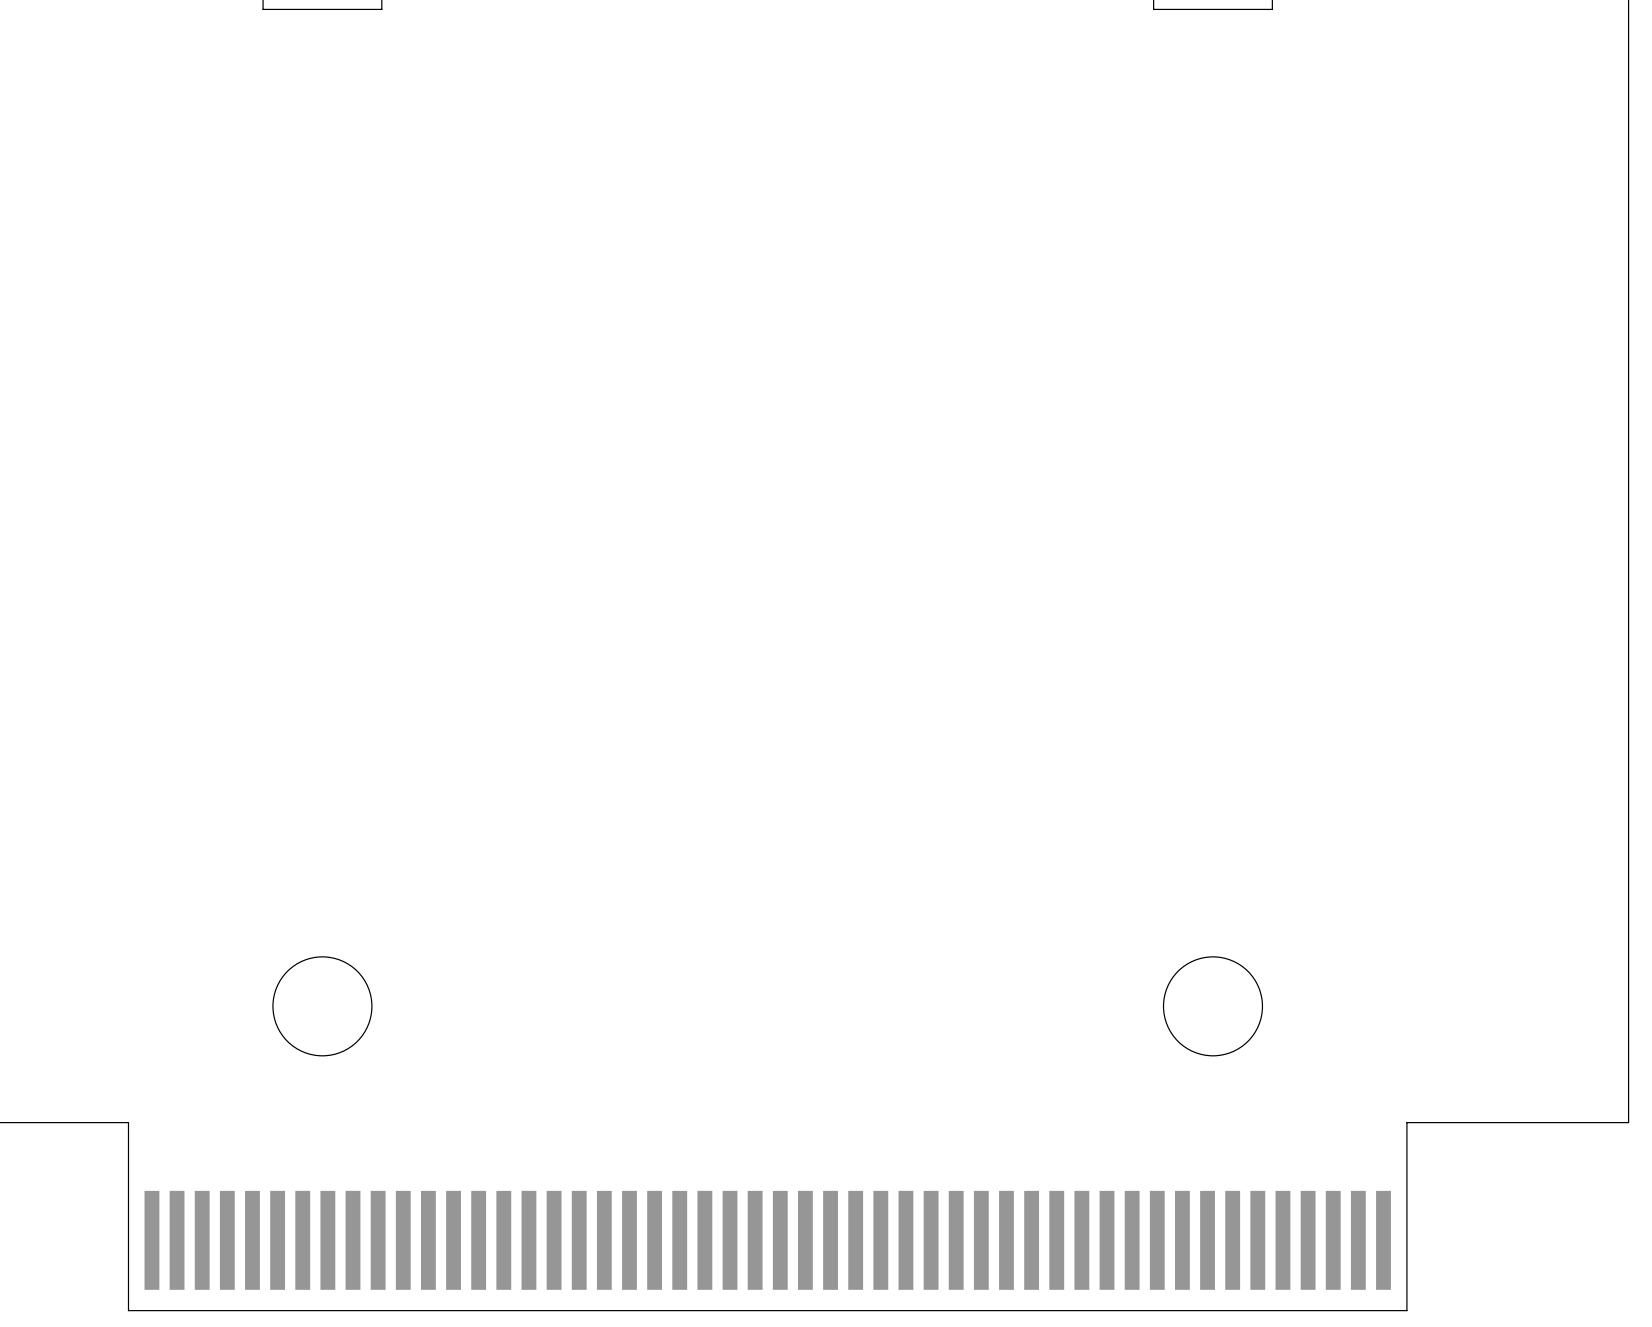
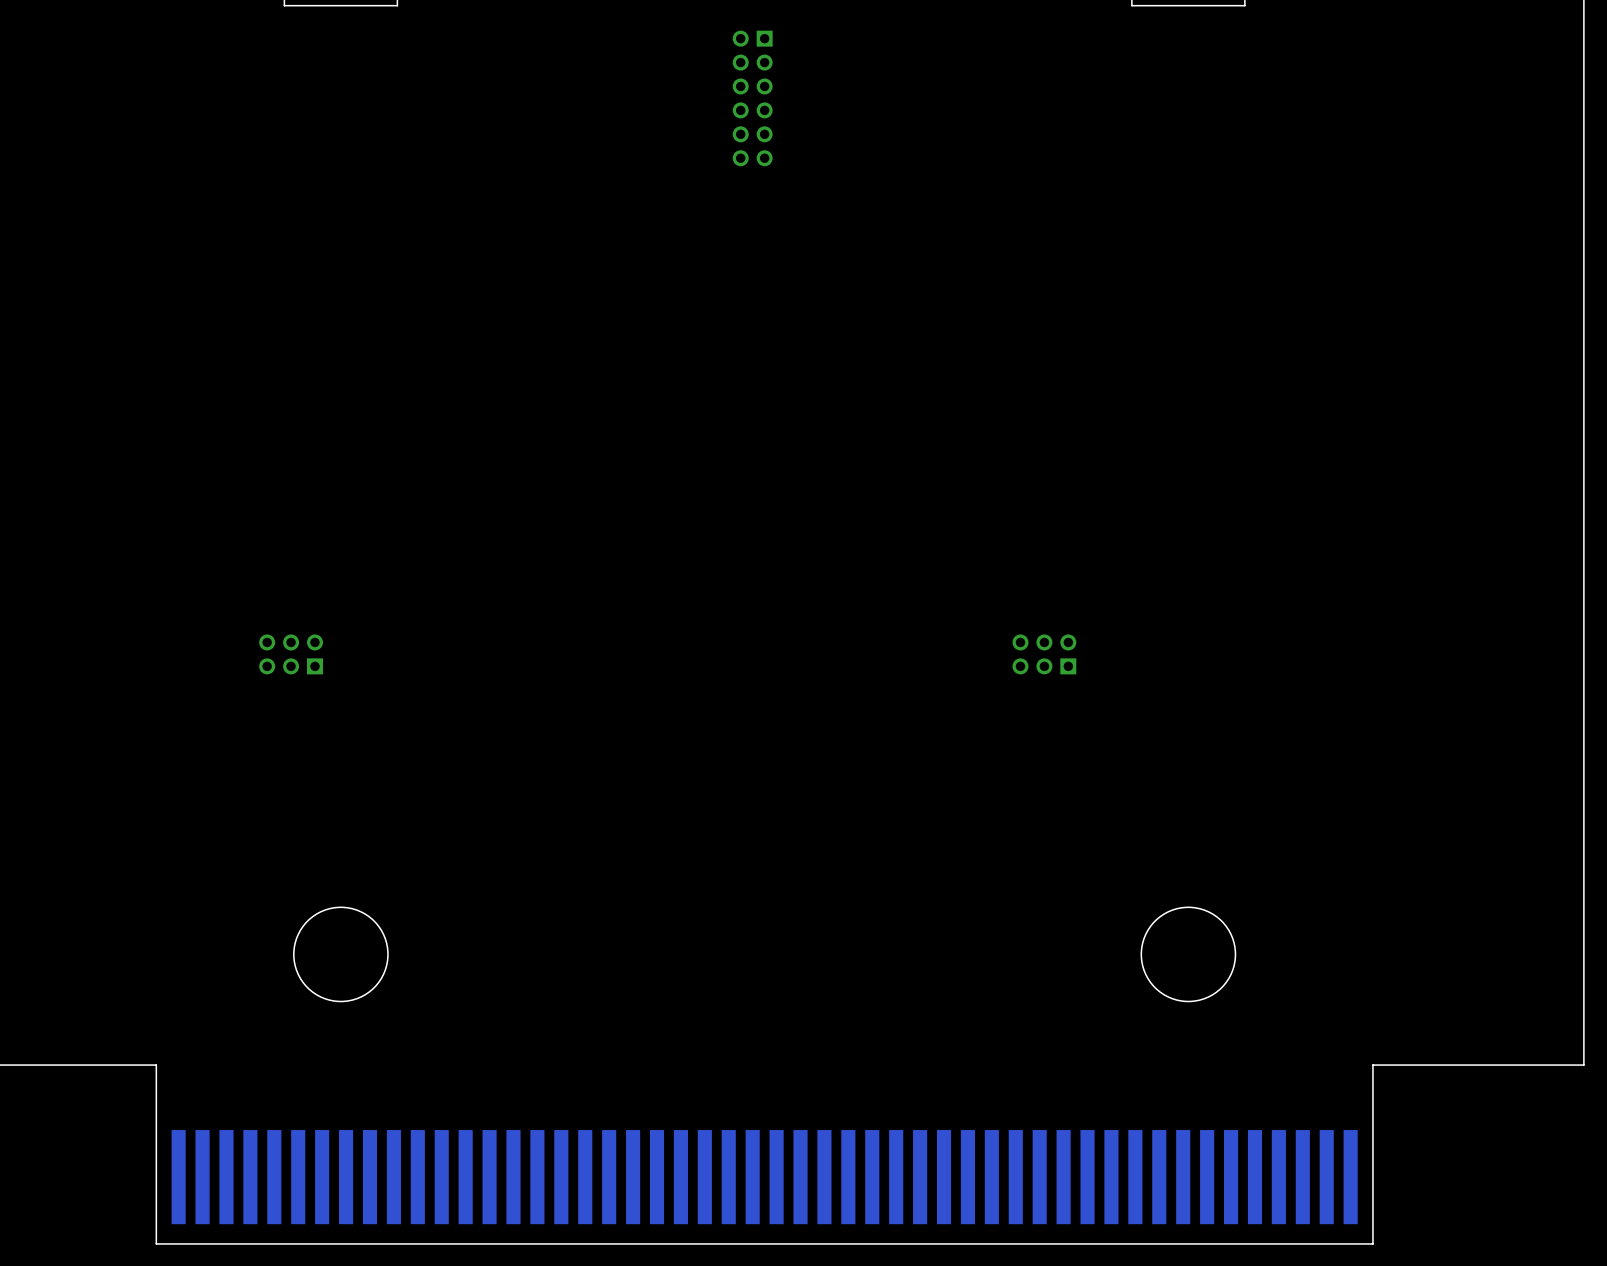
part: none -> (752, 98)
part: none -> (291, 654)
part: none -> (1044, 654)

